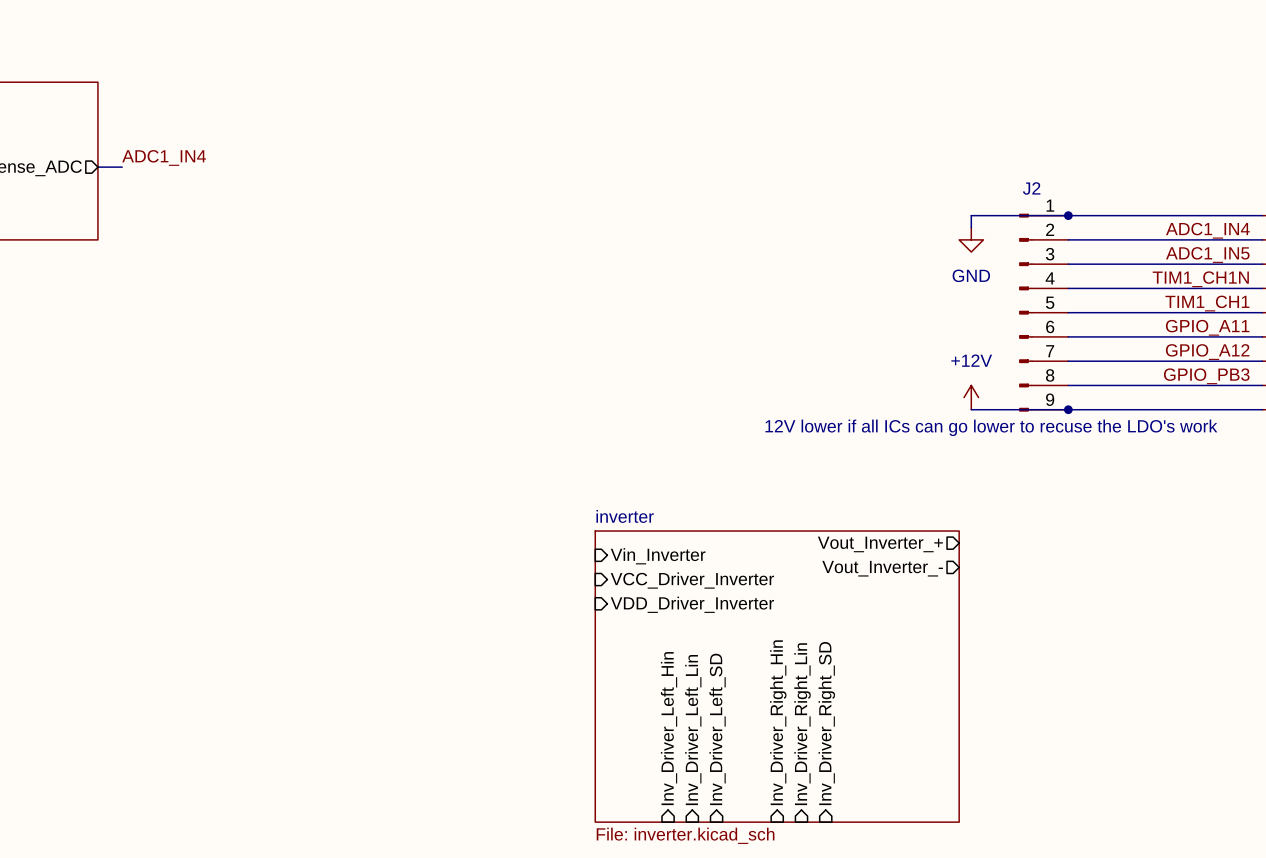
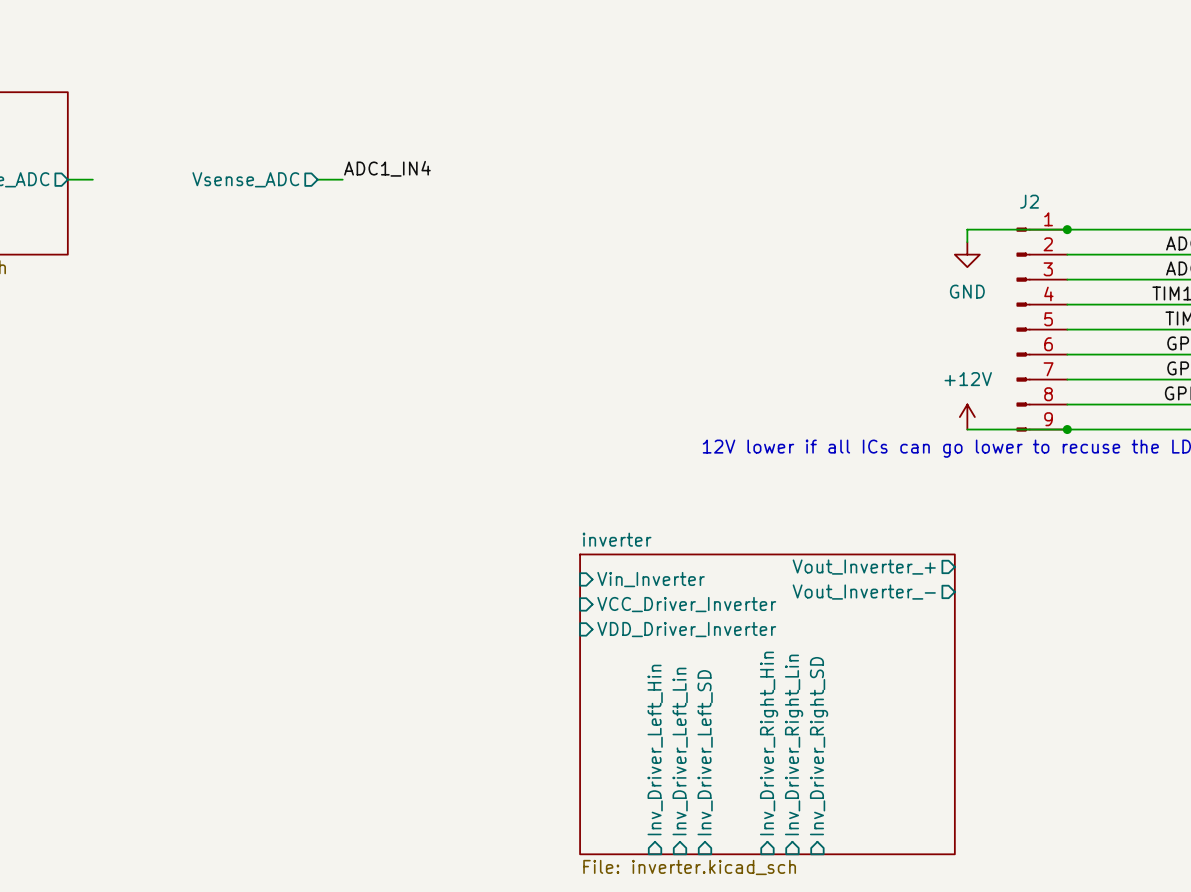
label: ADC1_IN4 (164, 157) -> none
label: none -> ADC1_IN4 (387, 168)
wire: none -> (317, 179) (342, 179)
sheet pin: none -> Vsense_ADC (245, 179)

